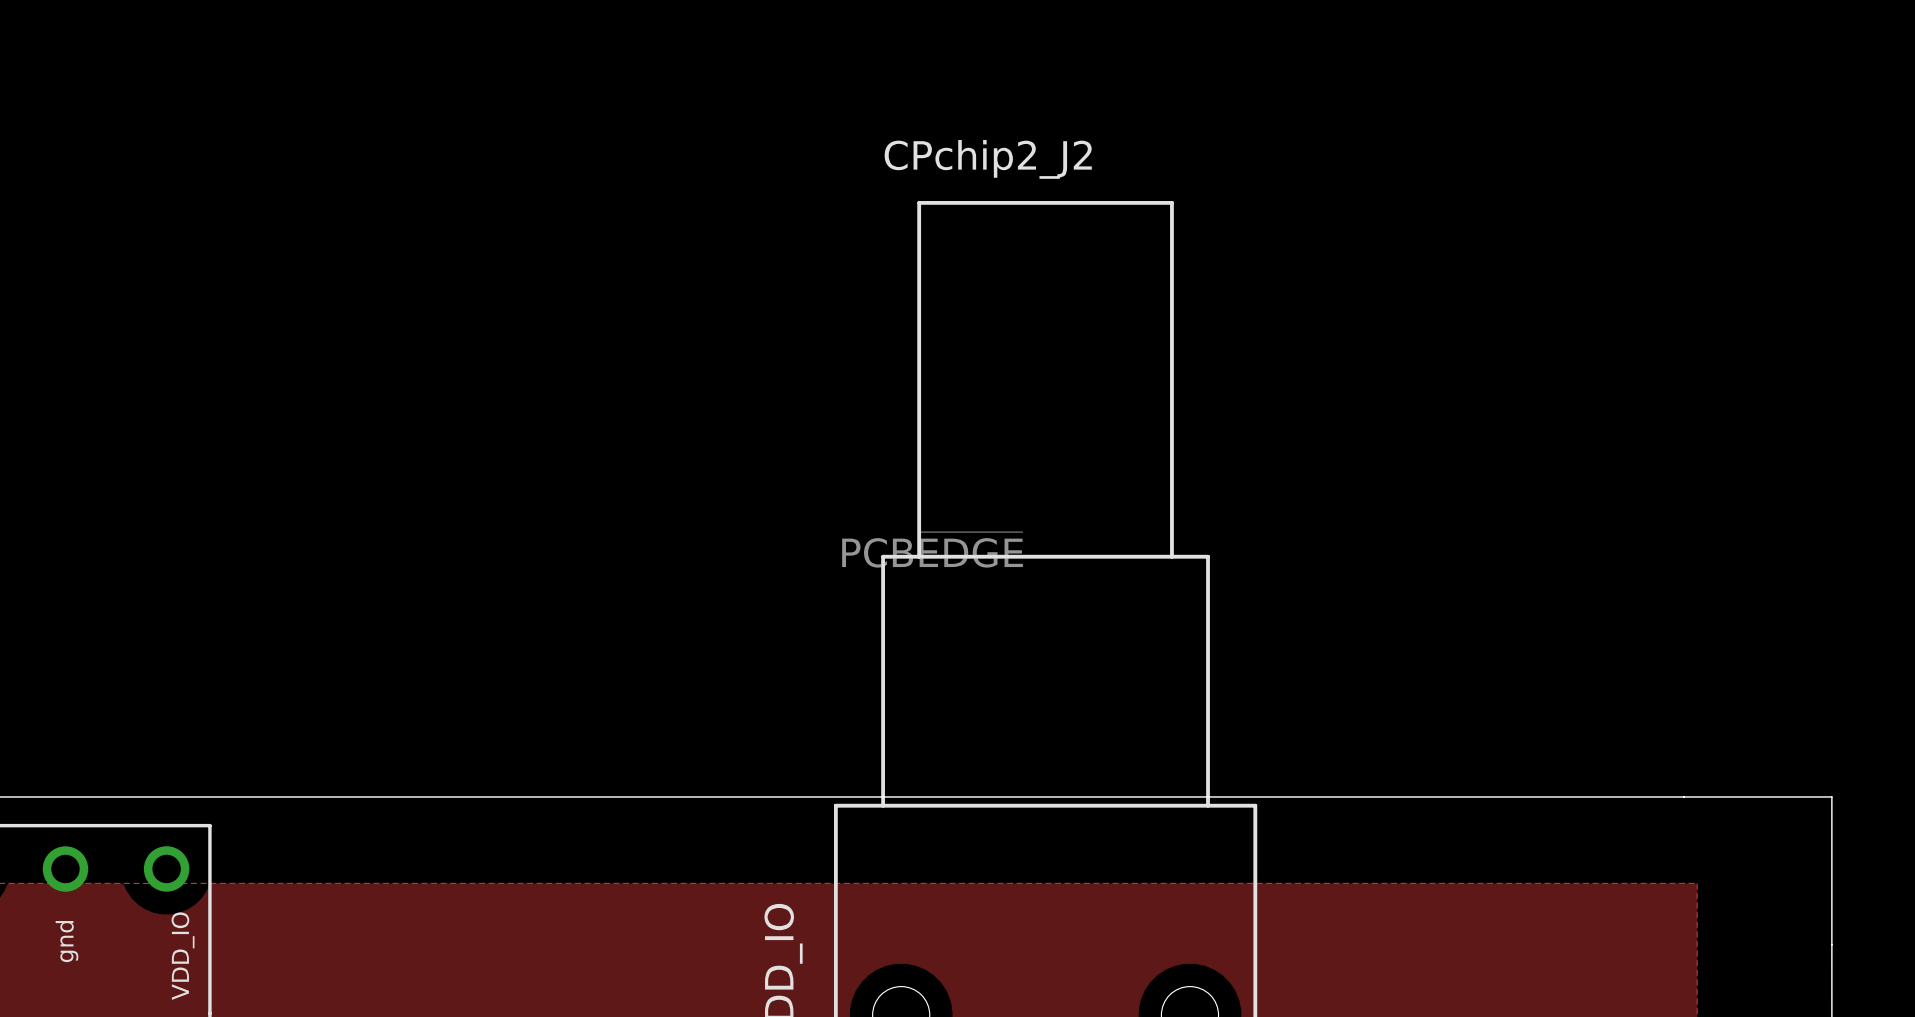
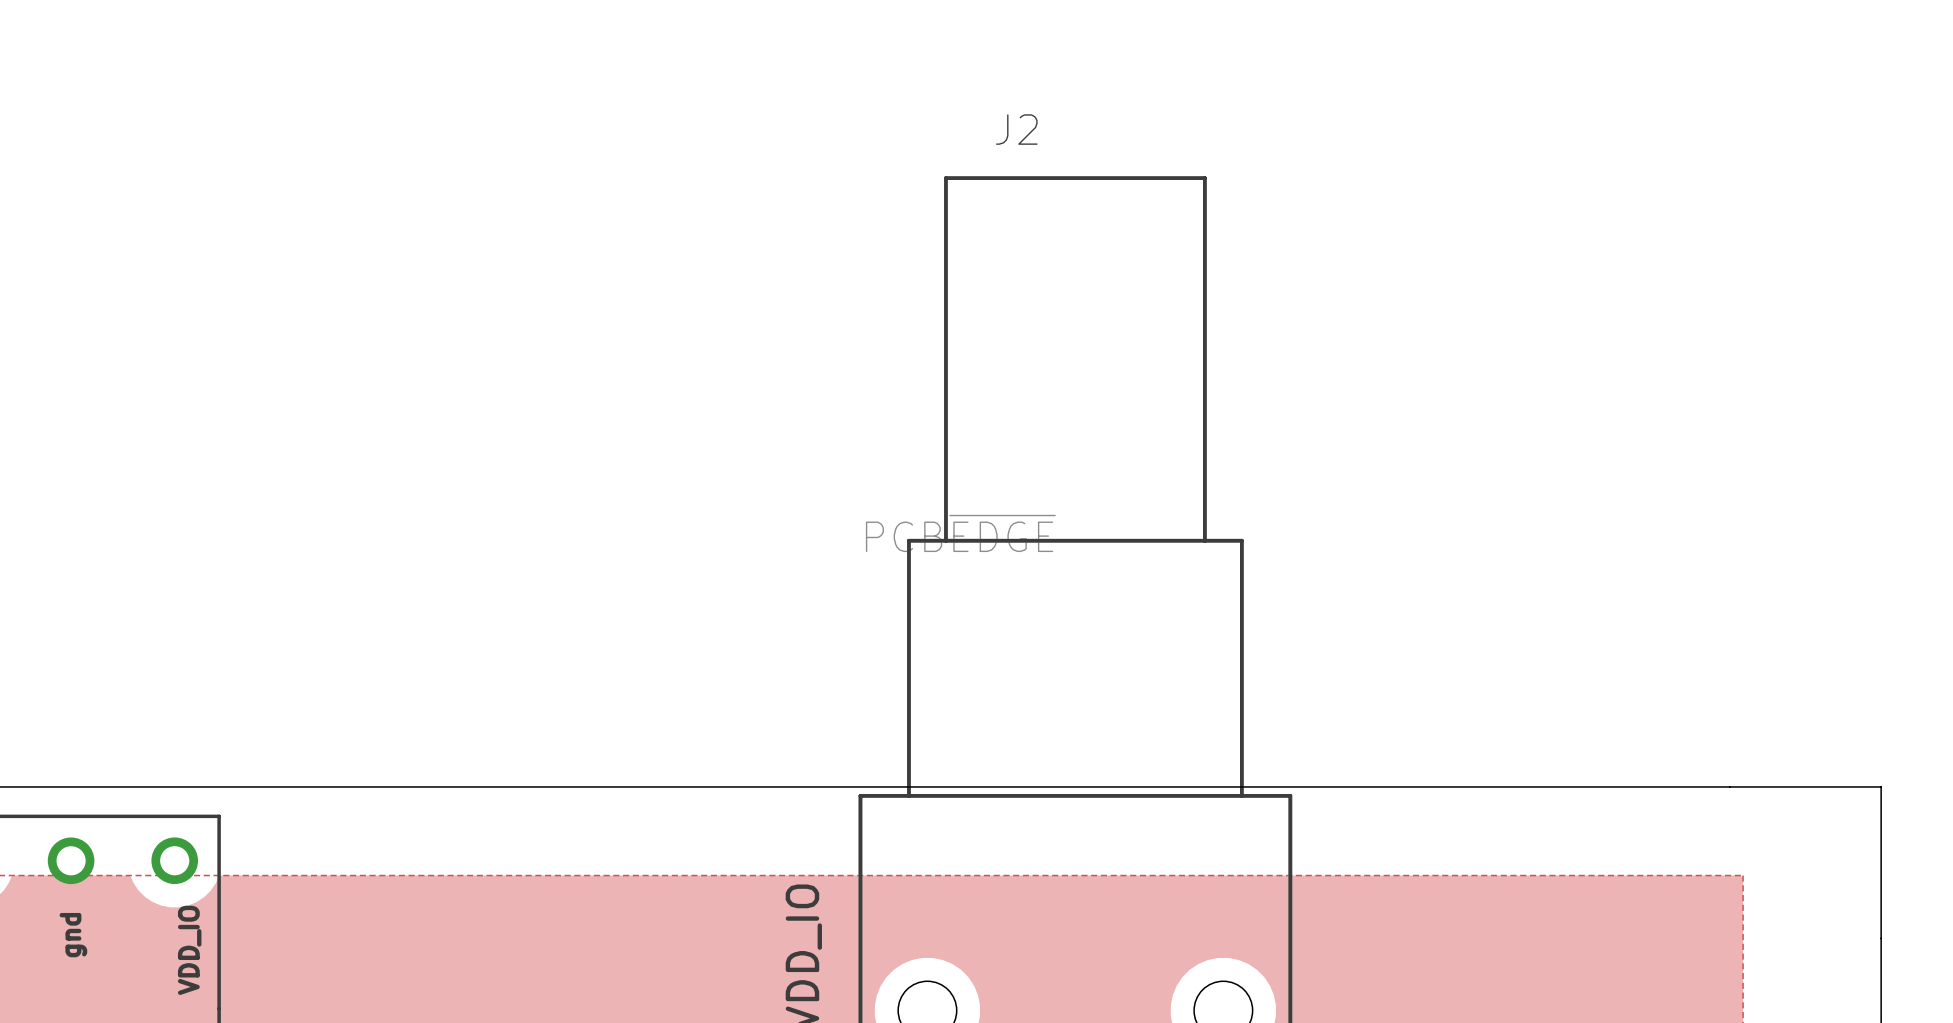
CPchip2_J2 name: CPchip2_J2 (988, 159) -> J2 (1016, 129)

